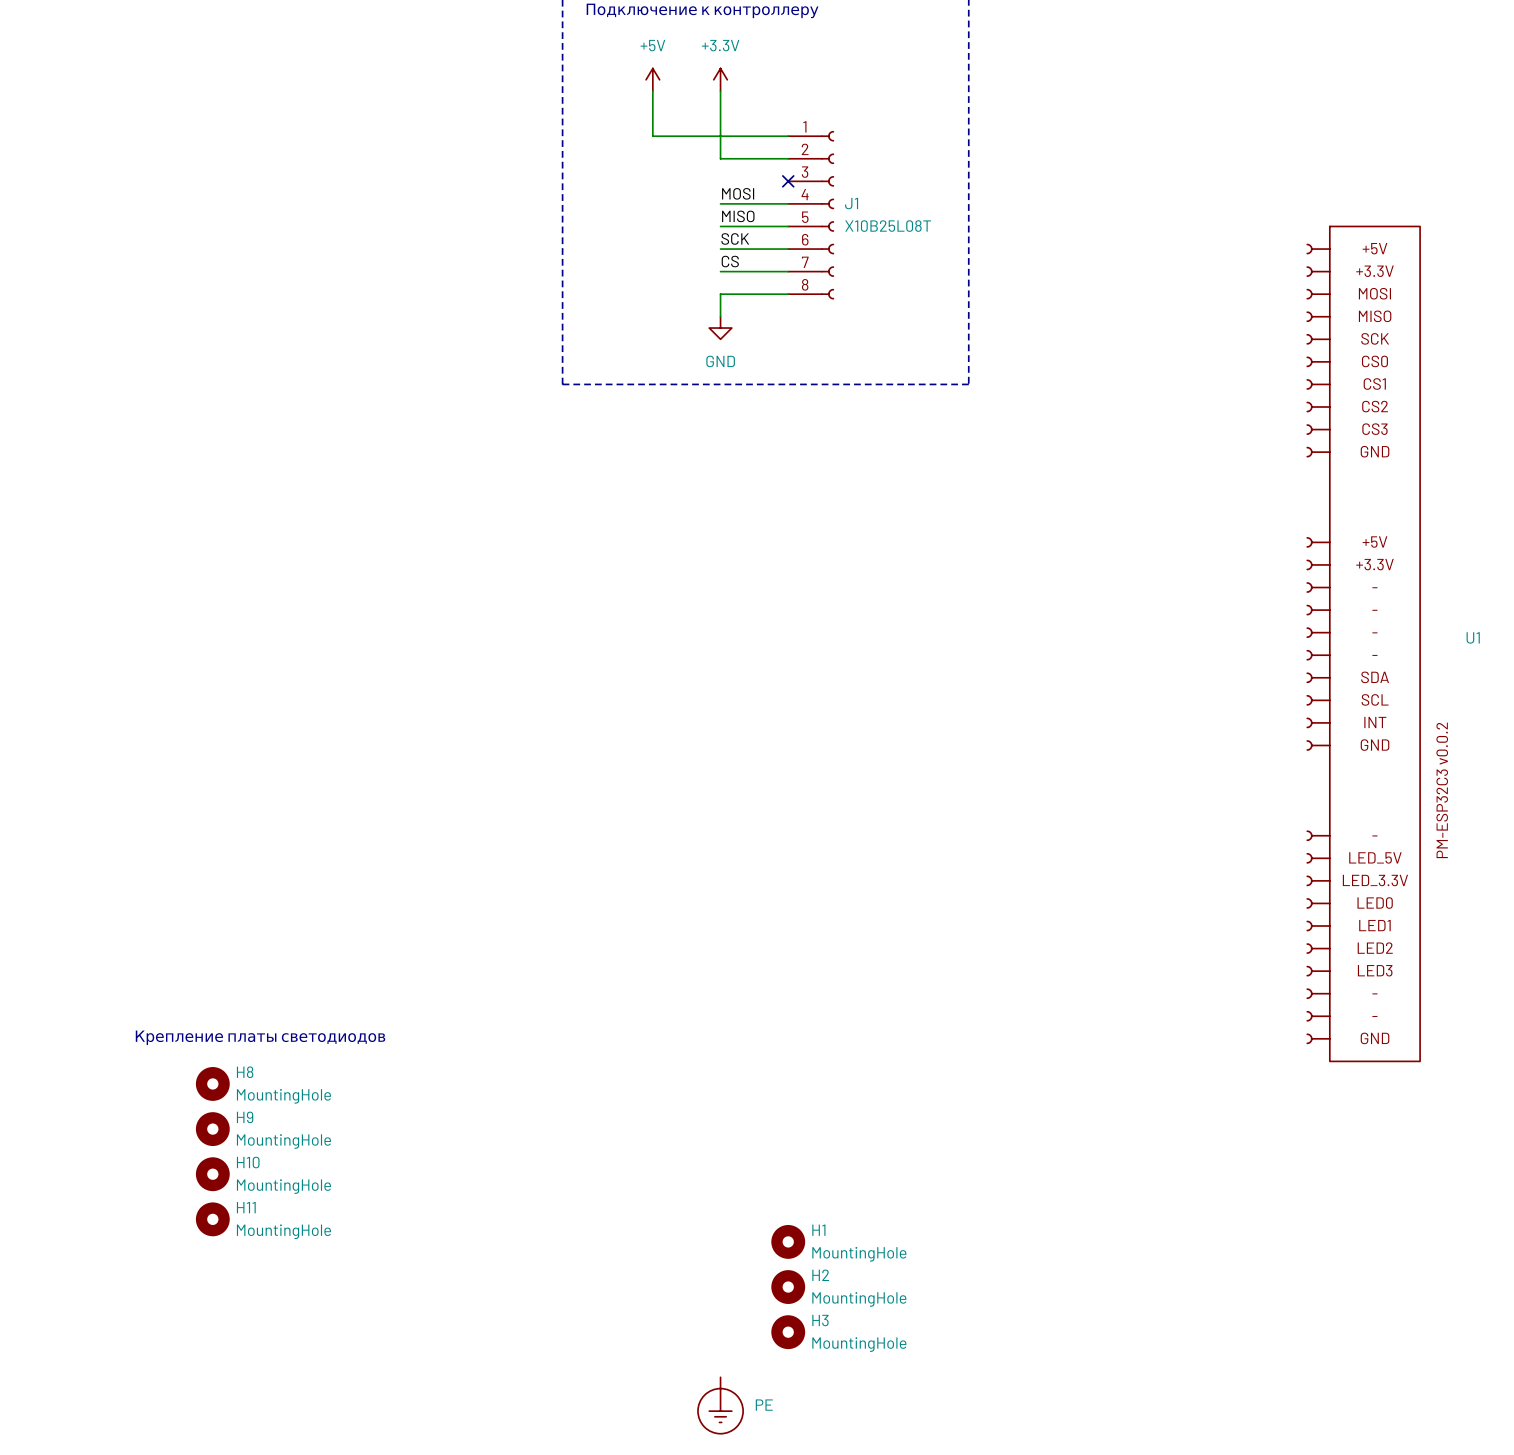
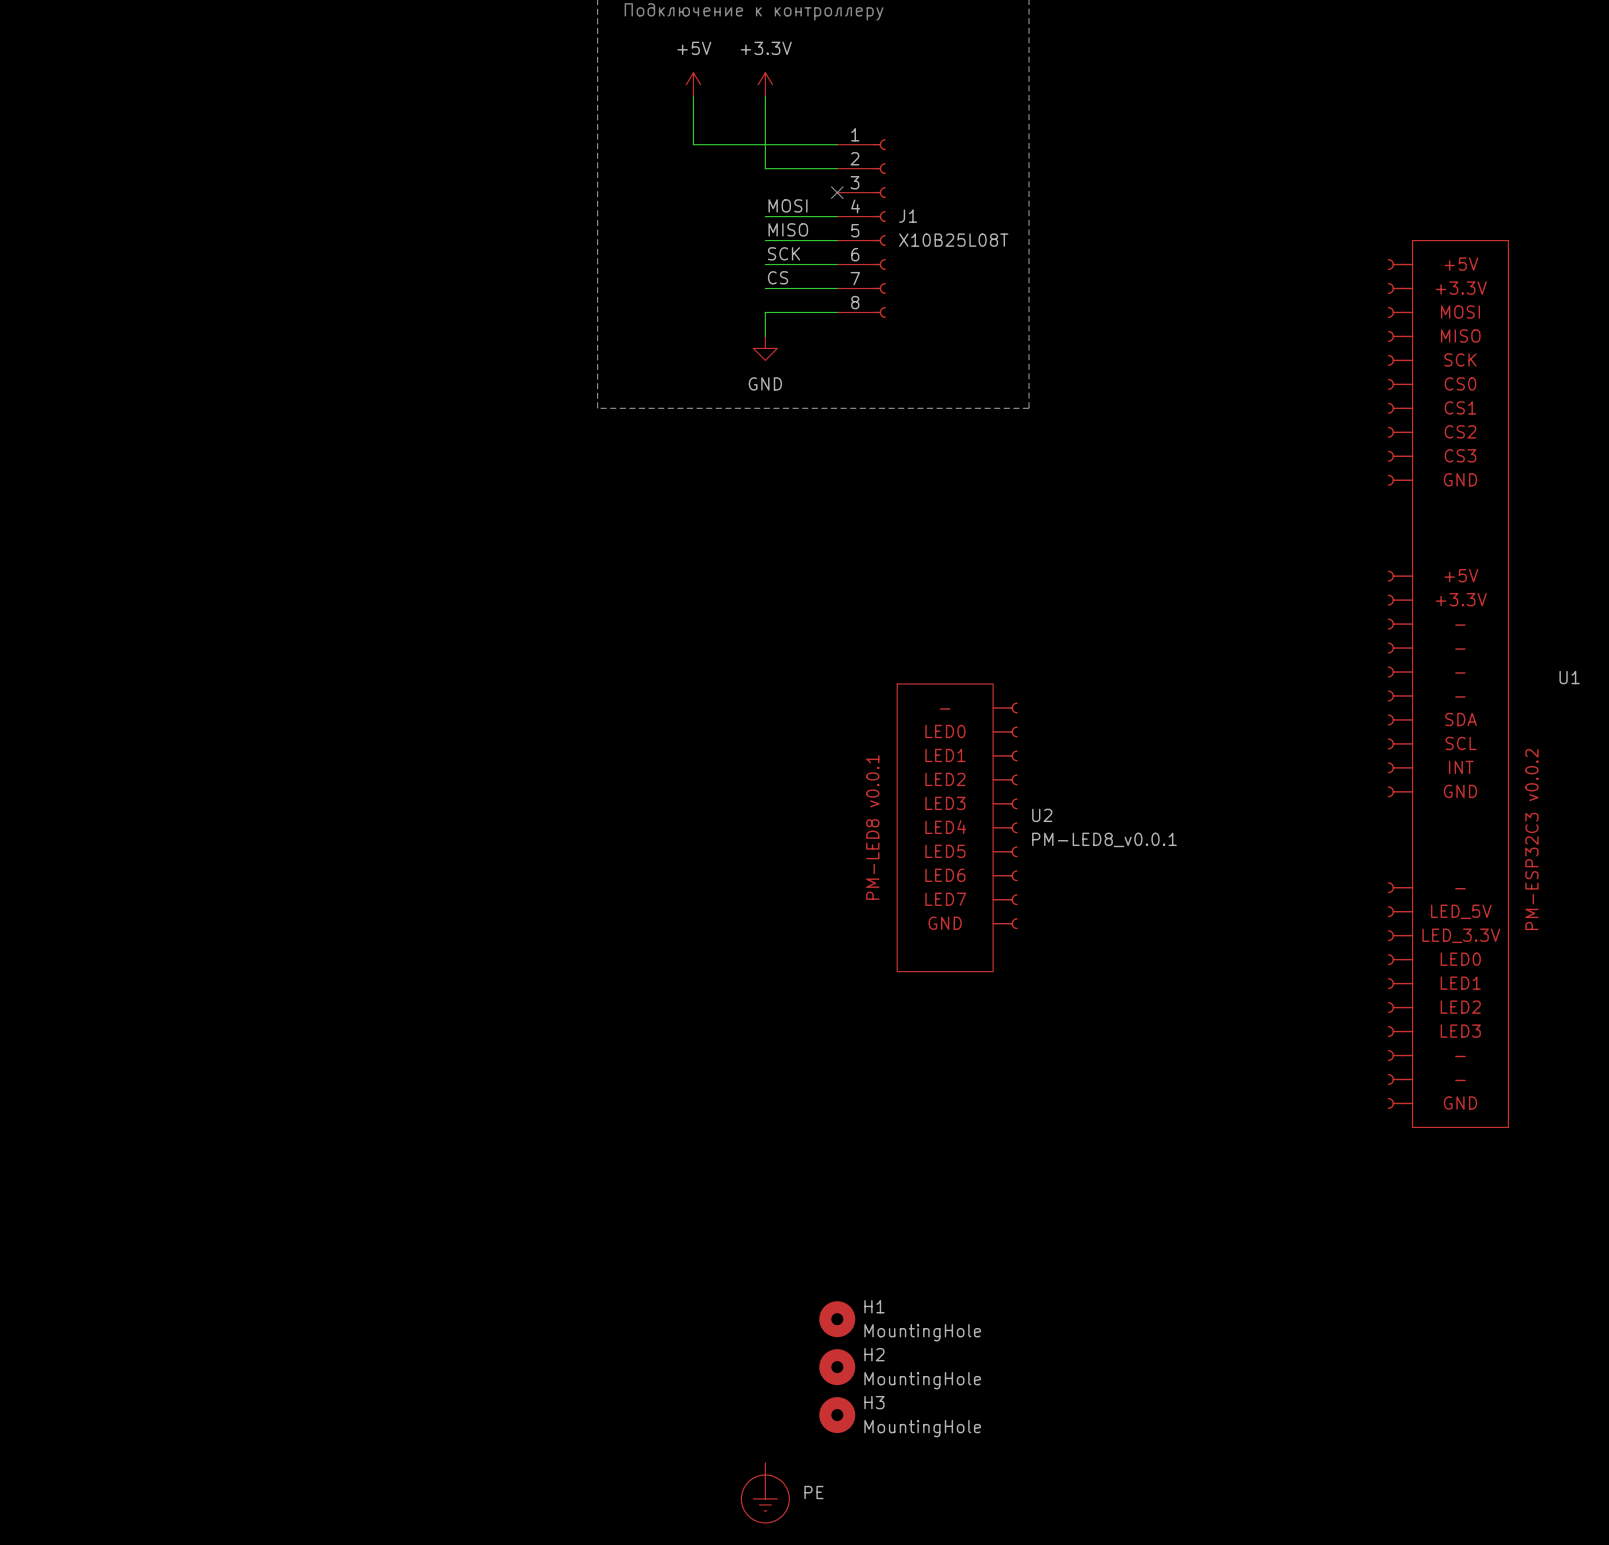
U2: none -> PM-LED8_v0.0.1 (957, 827)
text: Крепление платы светодиодов (260, 1037) -> none
H8: MountingHole (212, 1083) -> none
H9: MountingHole (212, 1129) -> none
H10: MountingHole (212, 1174) -> none
H11: MountingHole (212, 1219) -> none

